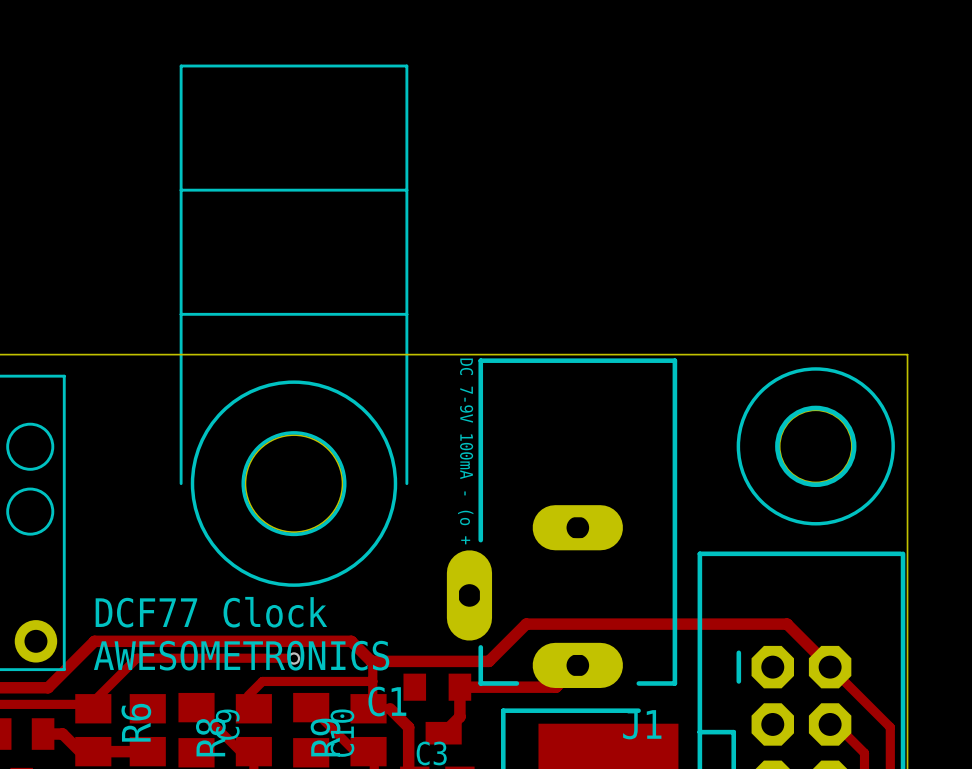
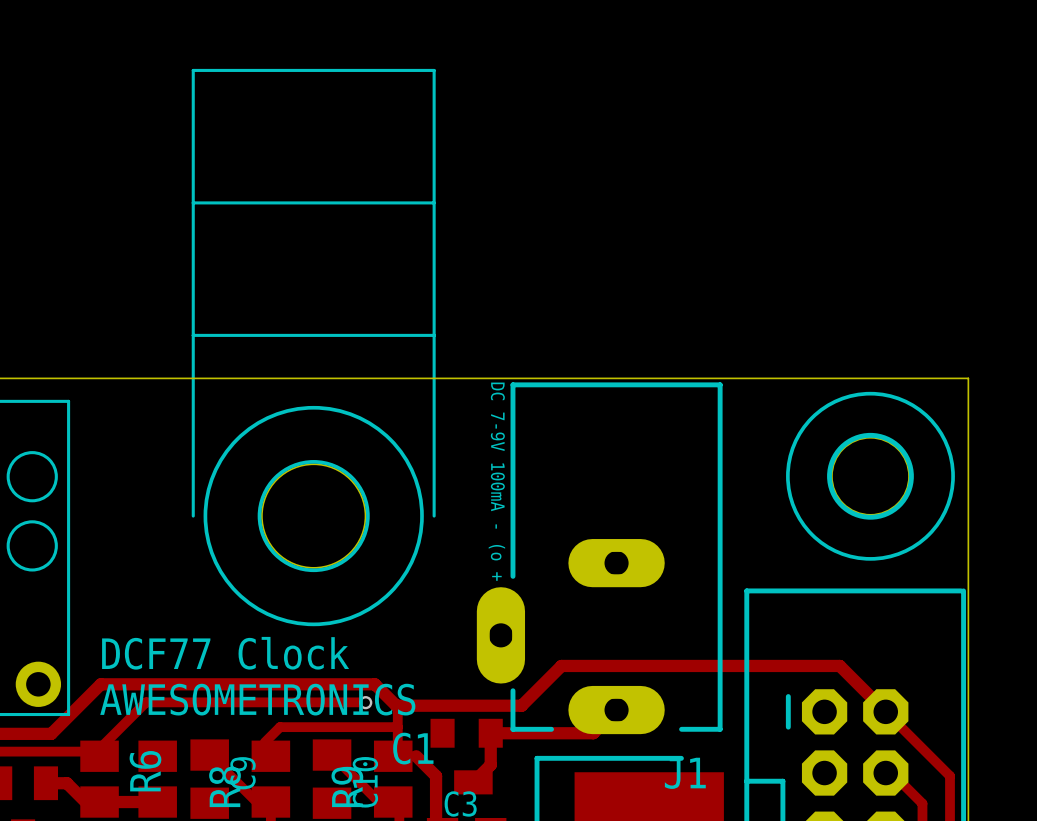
track: none -> (313, 702) (365, 702)
via position: (293, 658) -> (365, 702)

